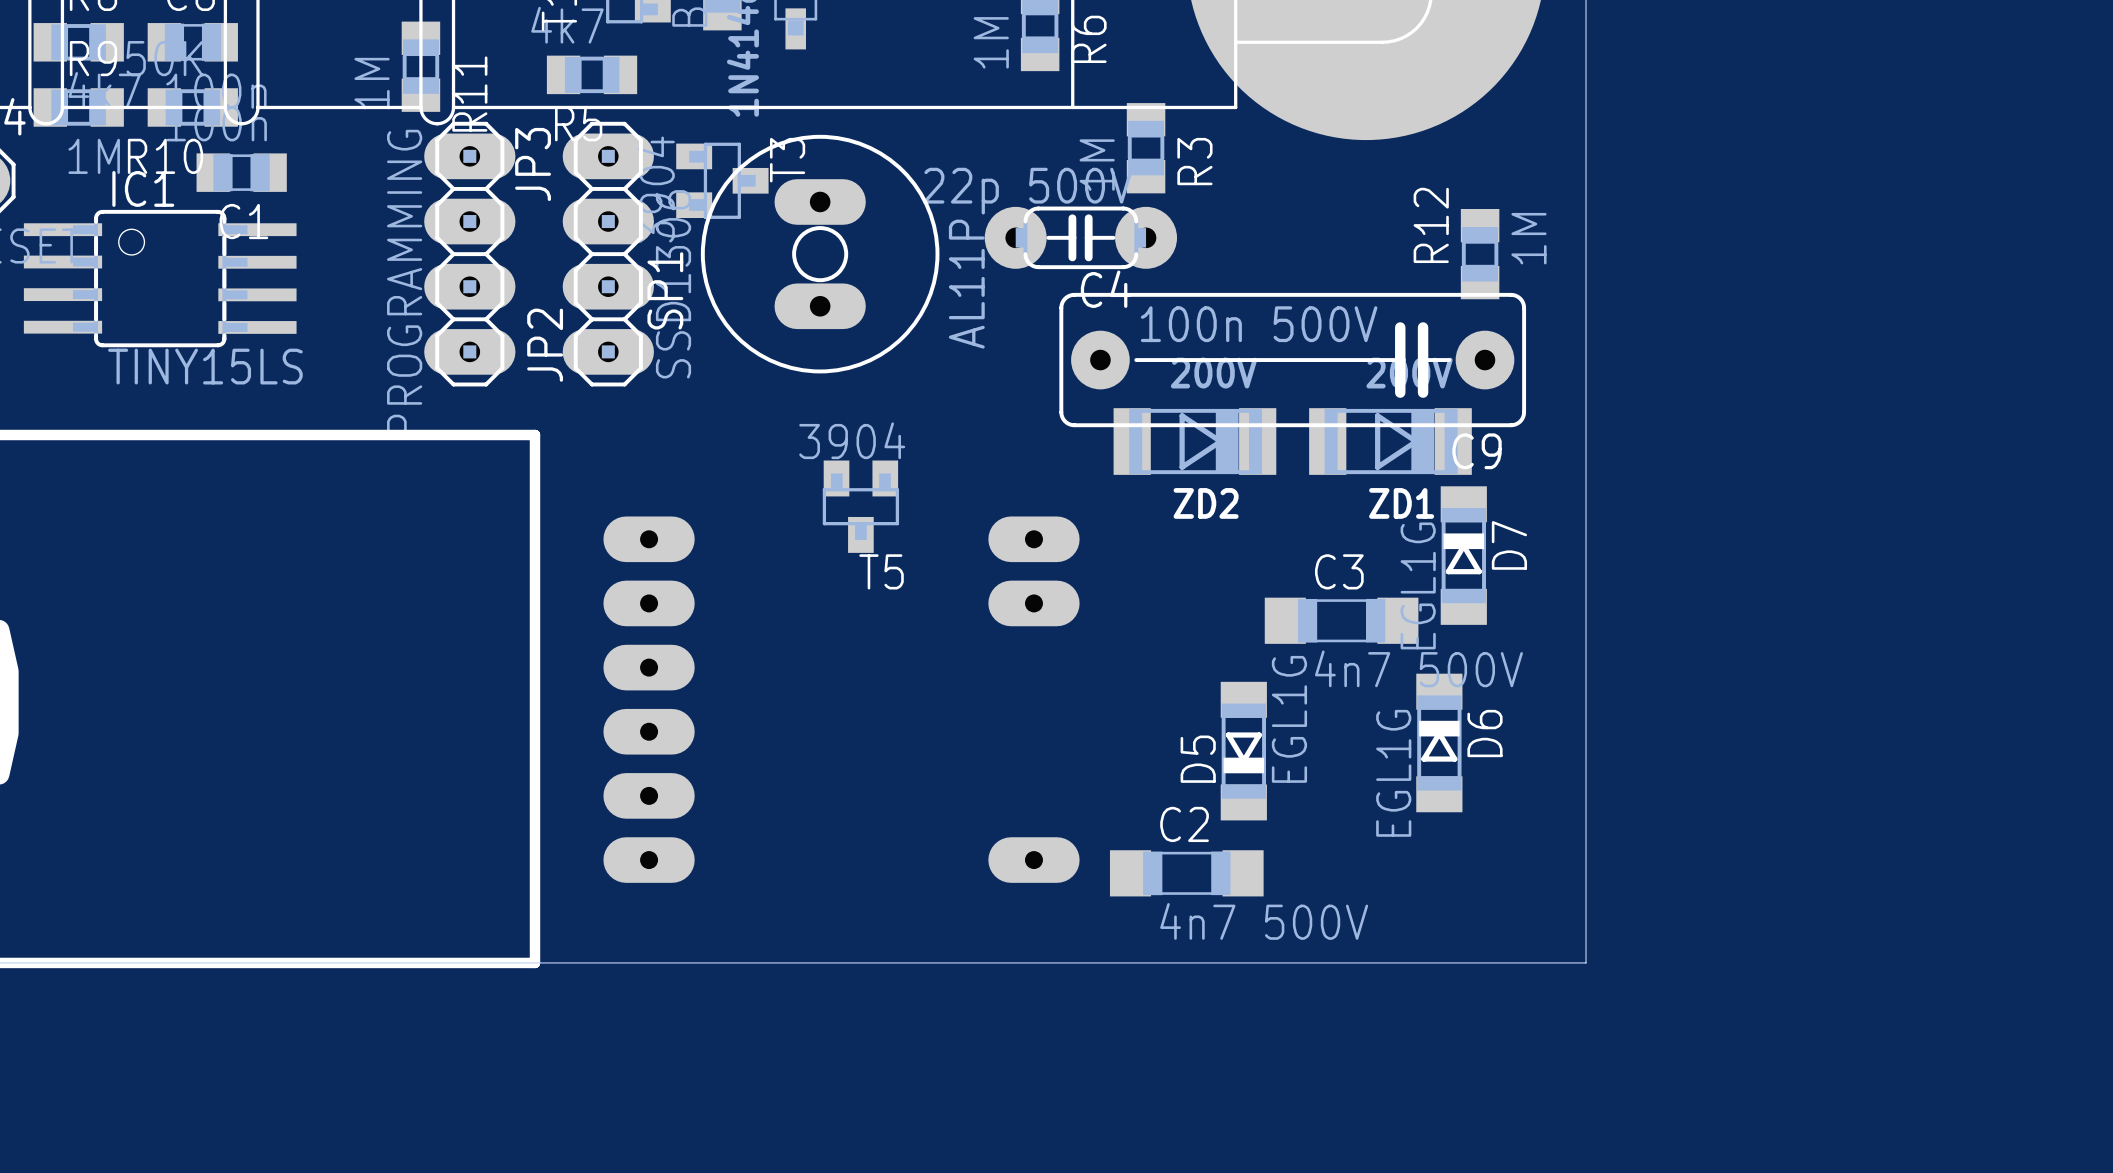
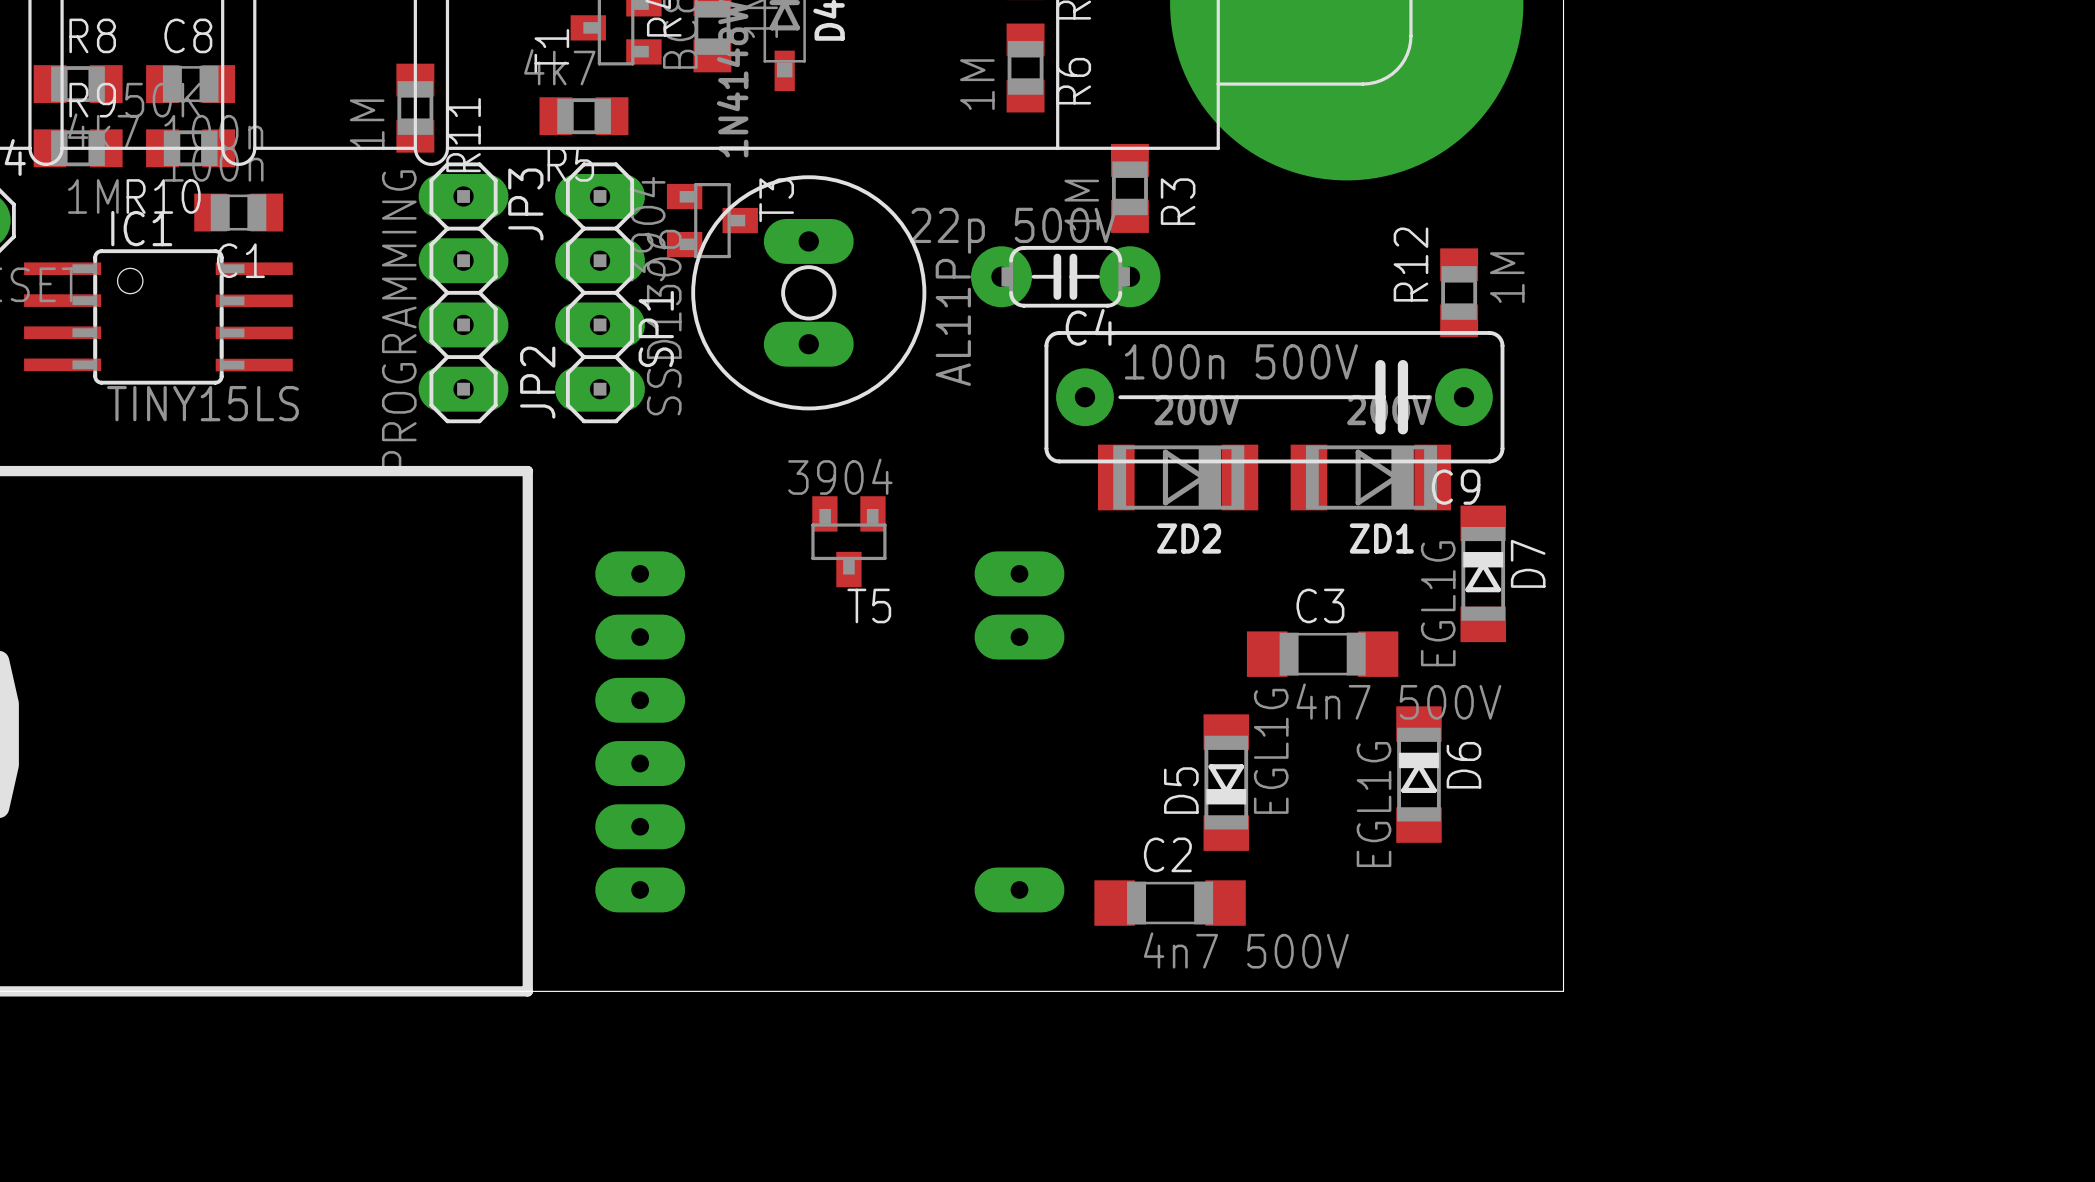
D7 position: (1463, 555) -> (1483, 573)

